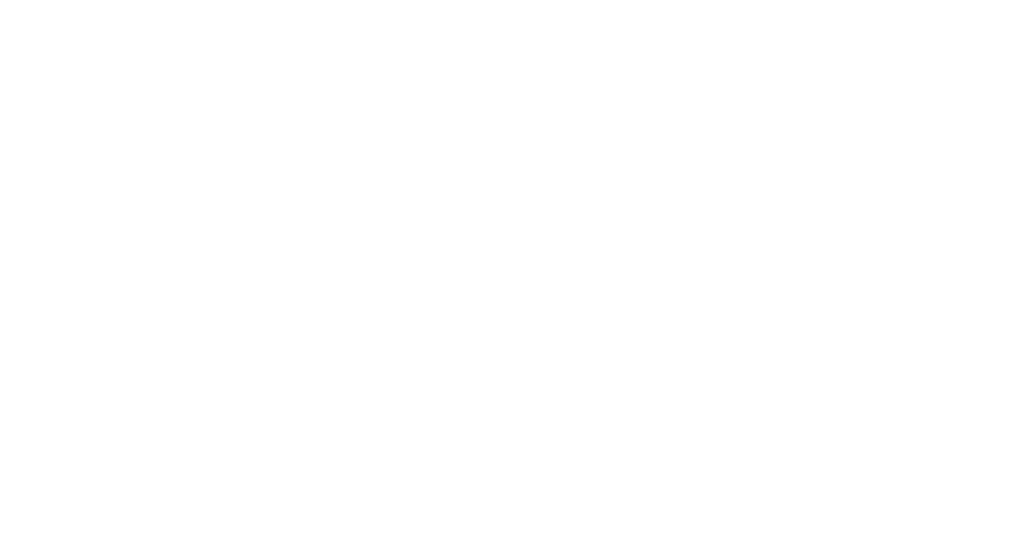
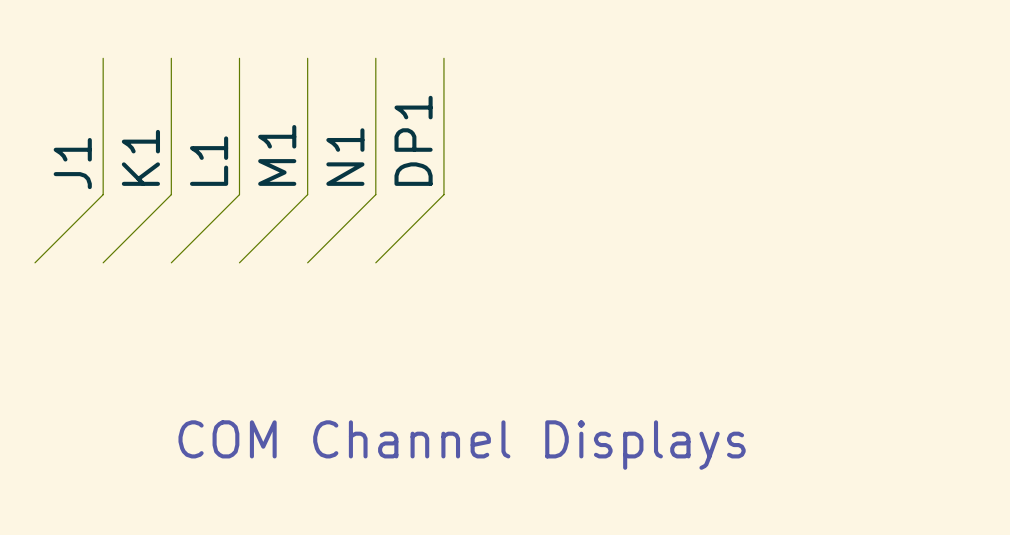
wire: none -> (103, 58) (103, 194) (35, 262)
wire: none -> (171, 58) (171, 194) (103, 262)
wire: none -> (239, 58) (239, 194) (171, 262)
wire: none -> (307, 58) (307, 194) (239, 262)
wire: none -> (375, 58) (375, 194) (307, 262)
wire: none -> (443, 58) (443, 194) (375, 262)
label: none -> DP1 (413, 140)
label: none -> M1 (277, 155)
label: none -> K1 (140, 157)
label: none -> N1 (345, 157)
label: none -> L1 (209, 161)
label: none -> J1 (72, 163)
text: none -> COM Channel Displays (462, 445)

